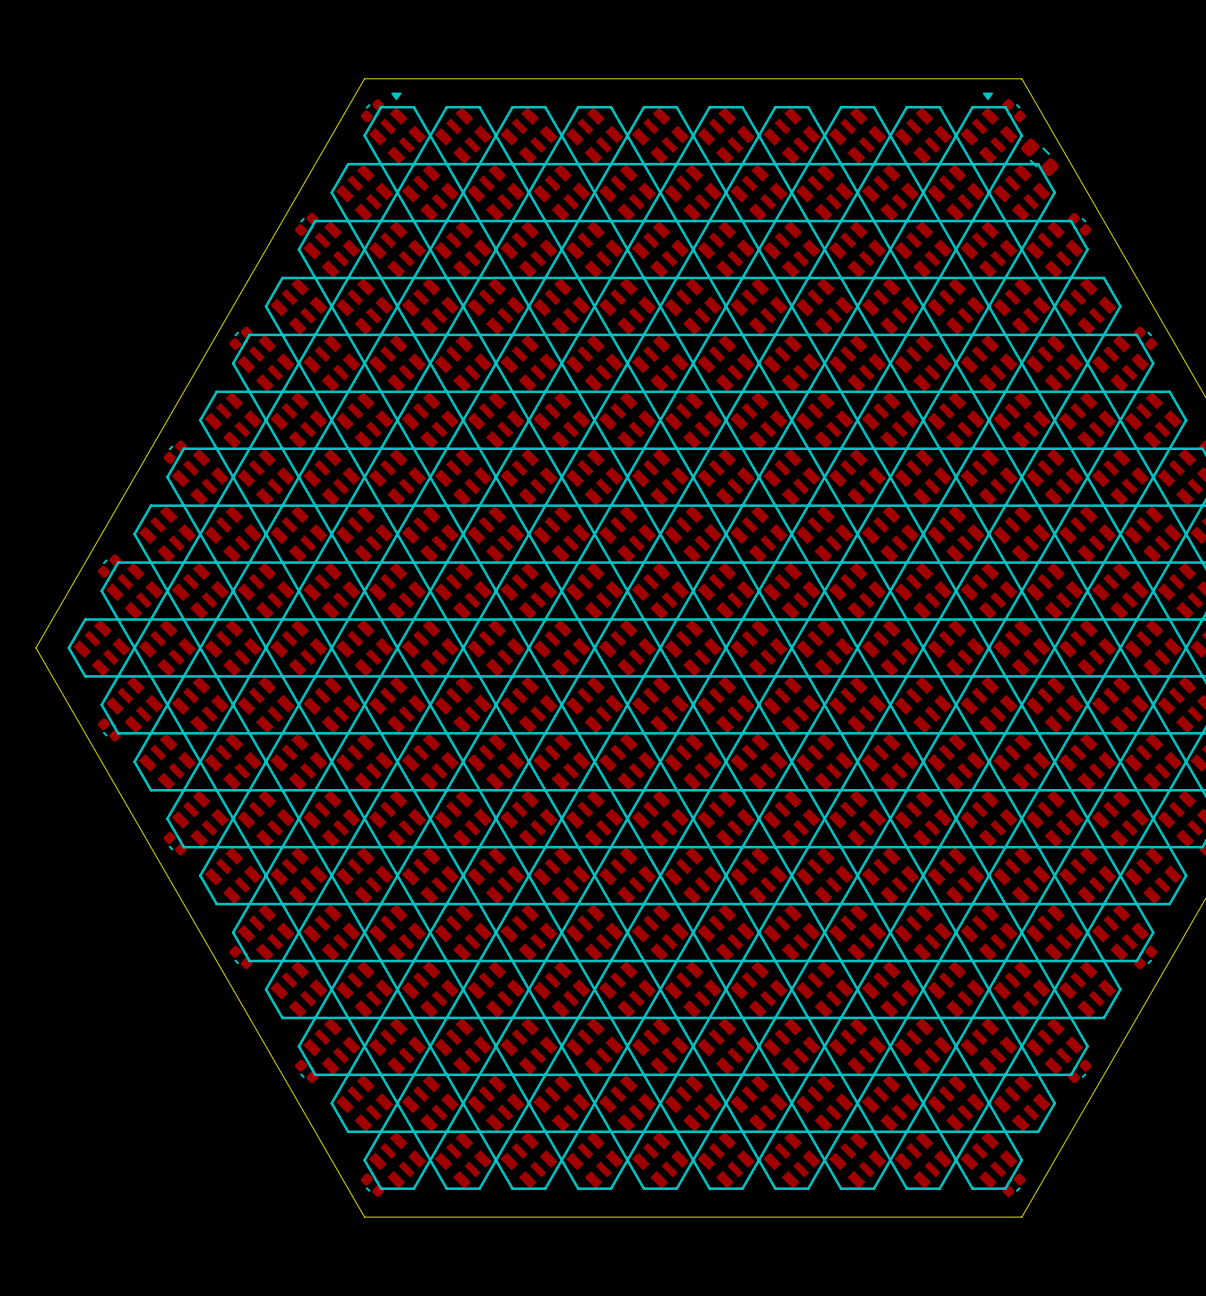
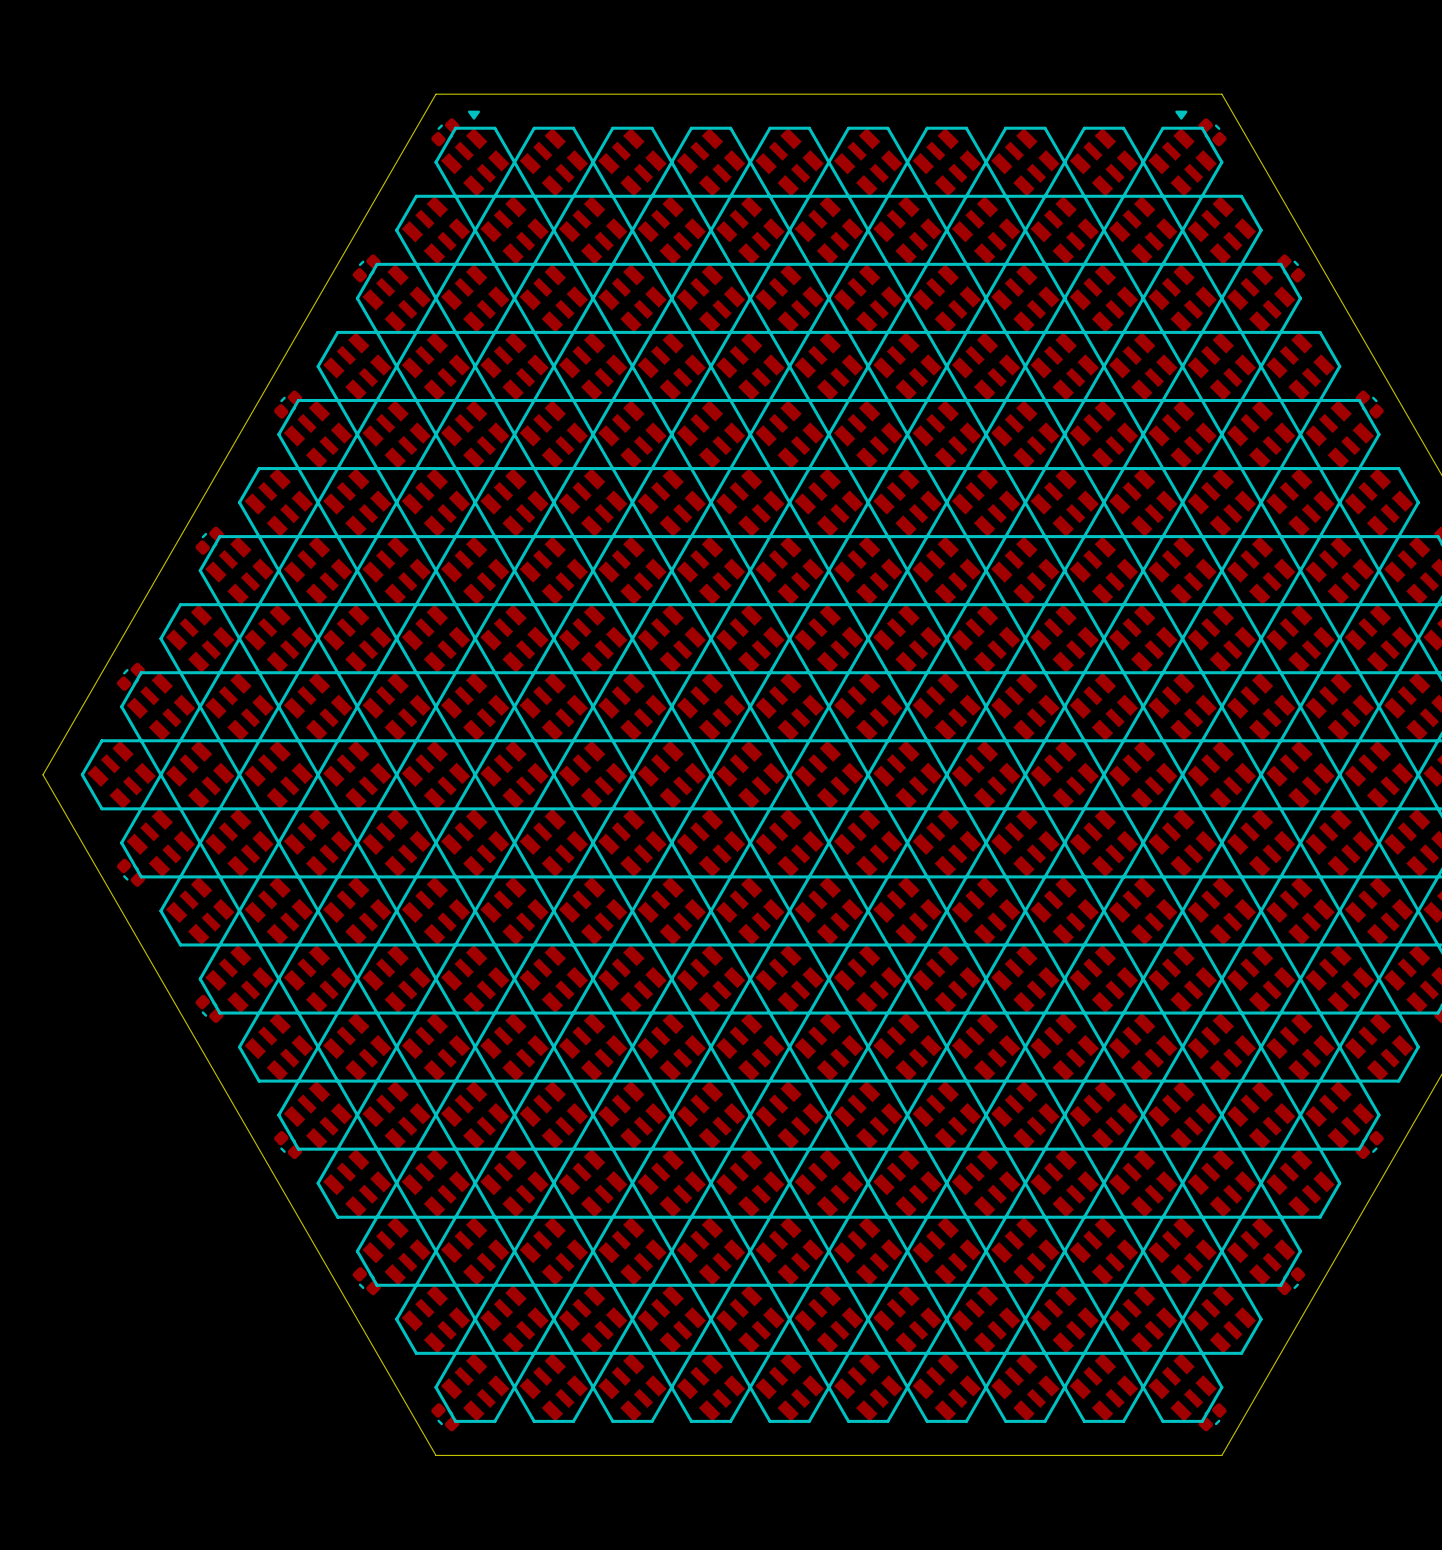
part: (1039, 157) -> none

